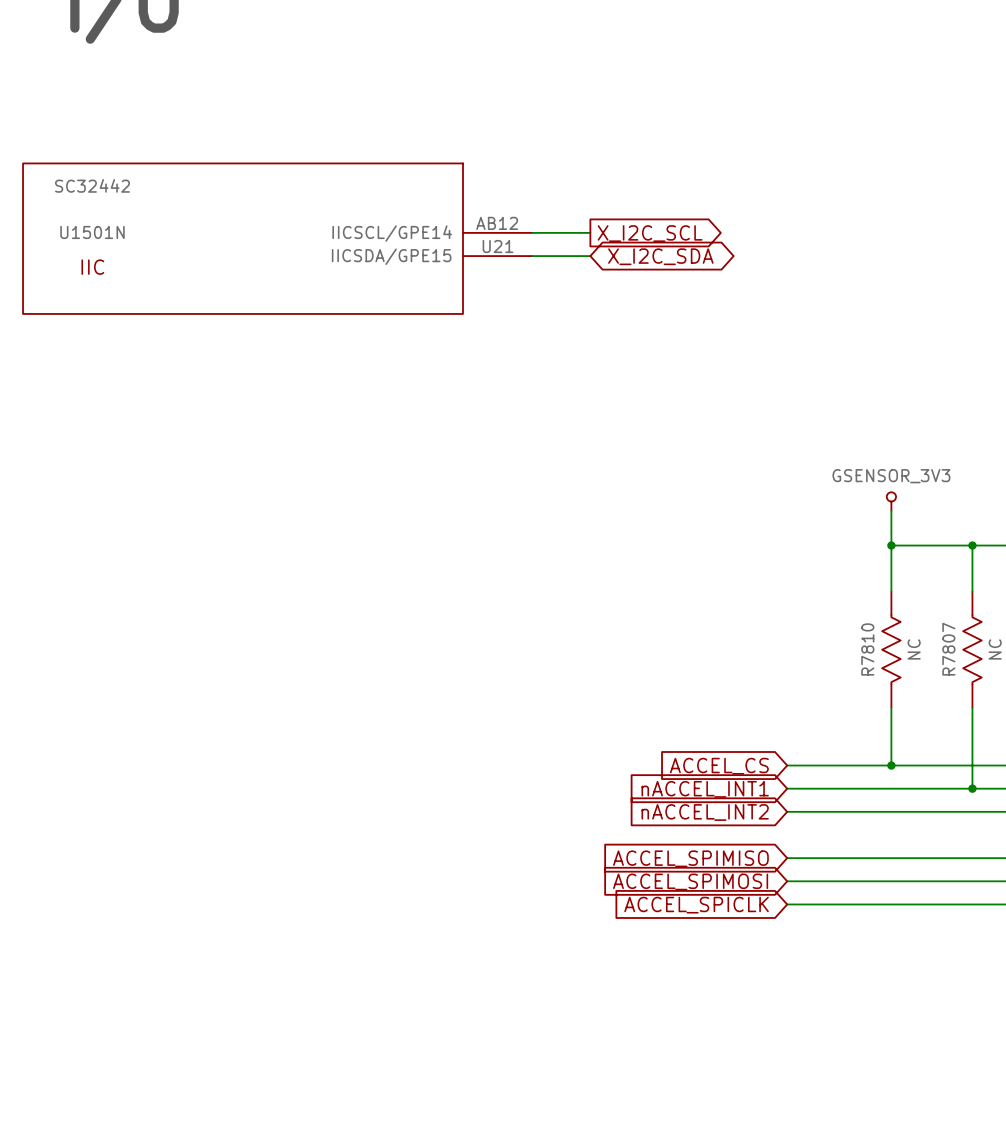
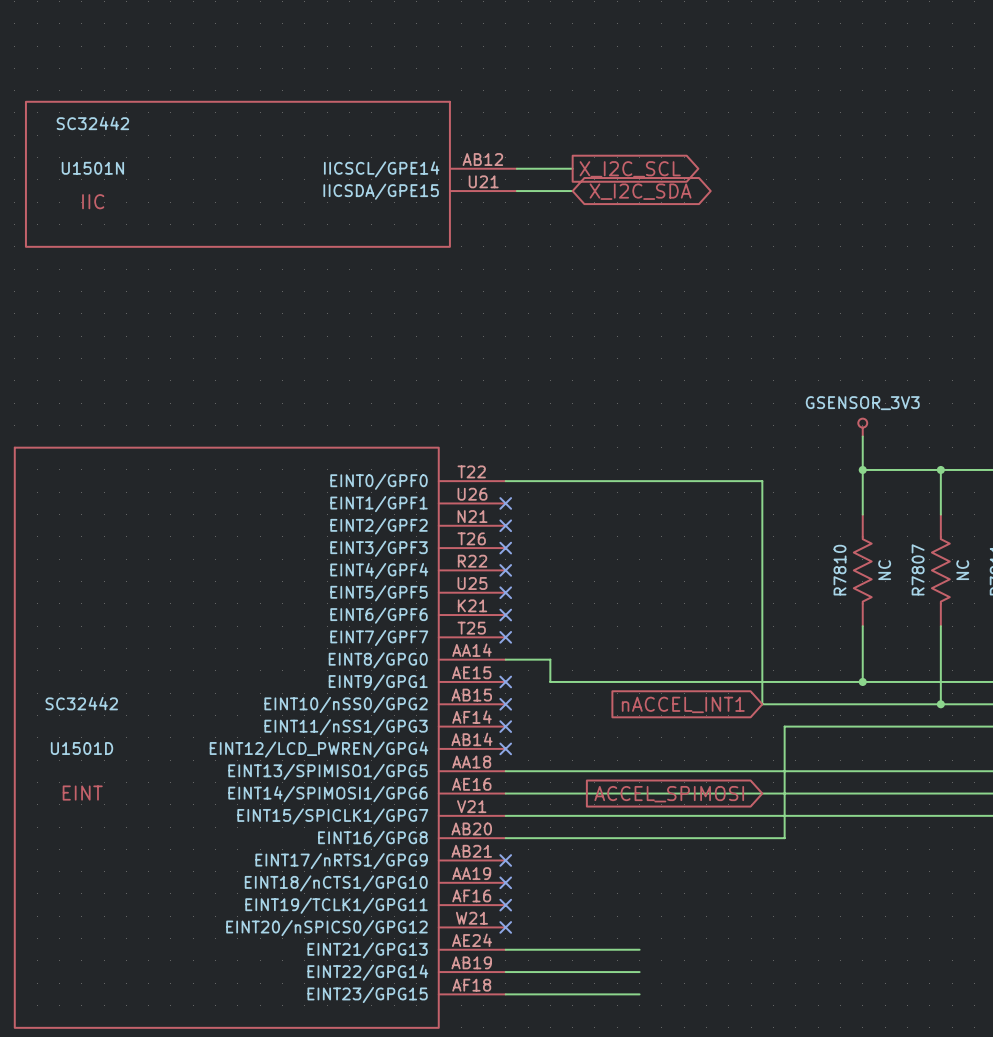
wire: none -> (505, 481) (762, 481) (762, 704)
no-connect mark: none -> (505, 503)
no-connect mark: none -> (505, 525)
no-connect mark: none -> (505, 548)
no-connect mark: none -> (505, 570)
no-connect mark: none -> (505, 592)
no-connect mark: none -> (505, 615)
no-connect mark: none -> (505, 637)
wire: none -> (505, 659) (550, 659) (550, 681) (762, 681)
no-connect mark: none -> (505, 681)
global label: ACCEL_CS (719, 766) -> none
no-connect mark: none -> (505, 704)
no-connect mark: none -> (505, 726)
wire: (787, 811) (810, 811) -> (505, 838) (784, 838) (784, 726)
global label: nACCEL_INT2 (705, 812) -> none
U1501D: none -> SC32442 (260, 737)
no-connect mark: none -> (505, 748)
wire: none -> (505, 771) (762, 771)
global label: ACCEL_SPIMISO (690, 858) -> none
wire: none -> (505, 793) (762, 793)
wire: none -> (505, 815) (762, 815)
global label: ACCEL_SPICLK (696, 905) -> none
no-connect mark: none -> (505, 860)
no-connect mark: none -> (505, 882)
no-connect mark: none -> (505, 905)
no-connect mark: none -> (505, 927)
wire: none -> (505, 949) (639, 949)
wire: none -> (505, 972) (639, 972)
wire: none -> (505, 994) (639, 994)

